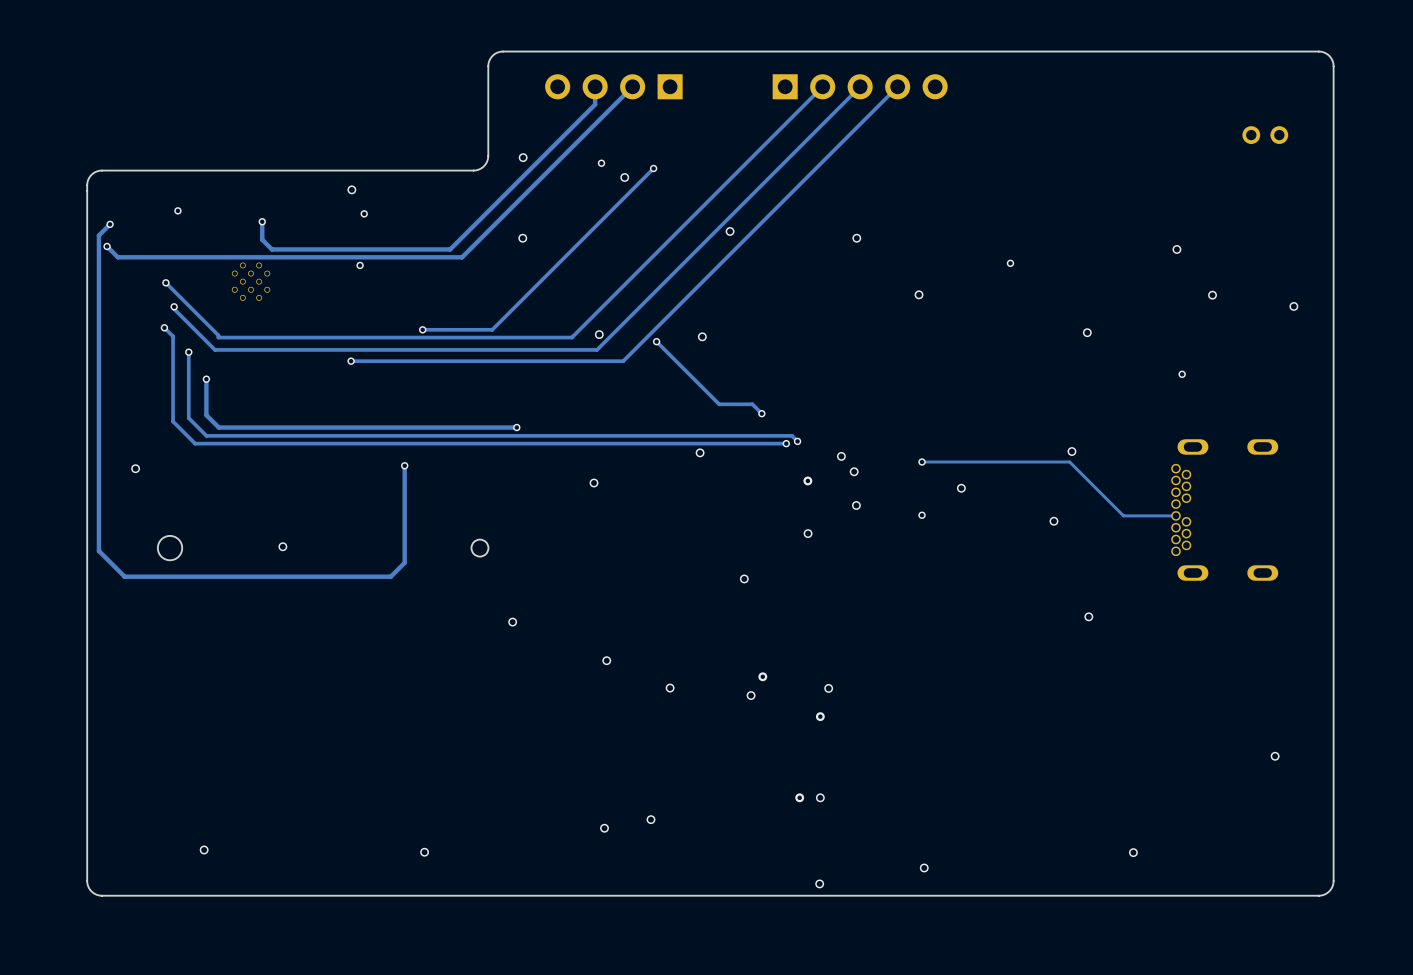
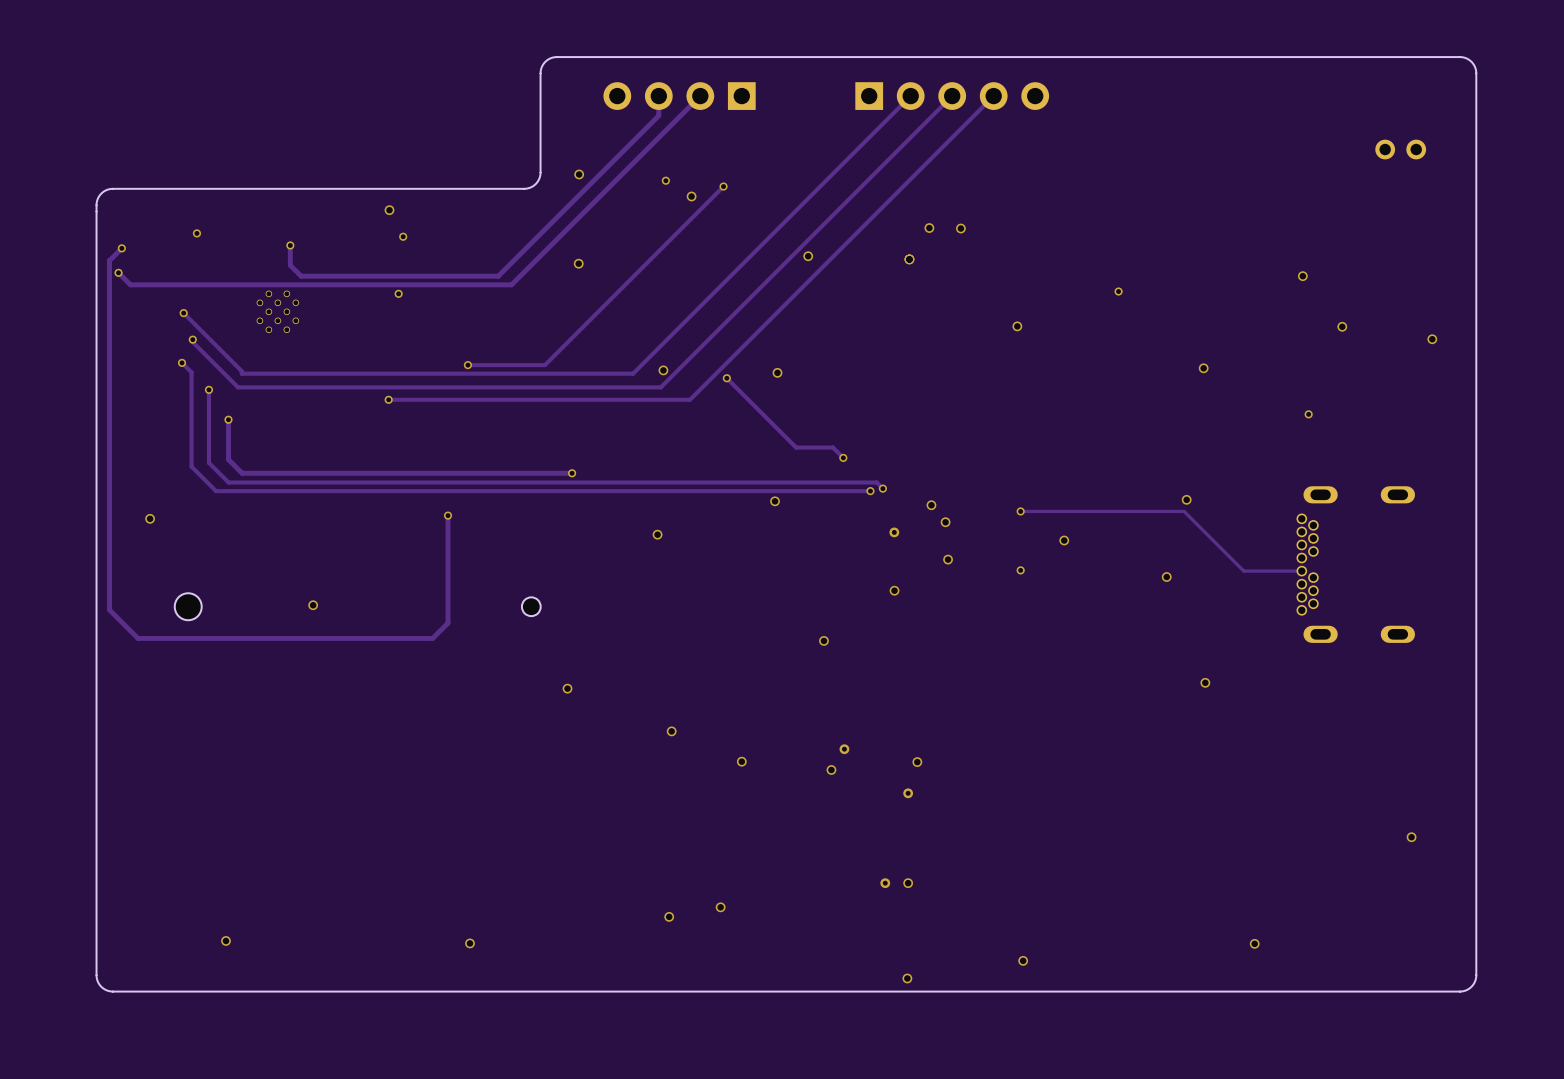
via: none -> (929, 228)
via: none -> (960, 228)
via: none -> (909, 259)
via: (856, 238) -> none

